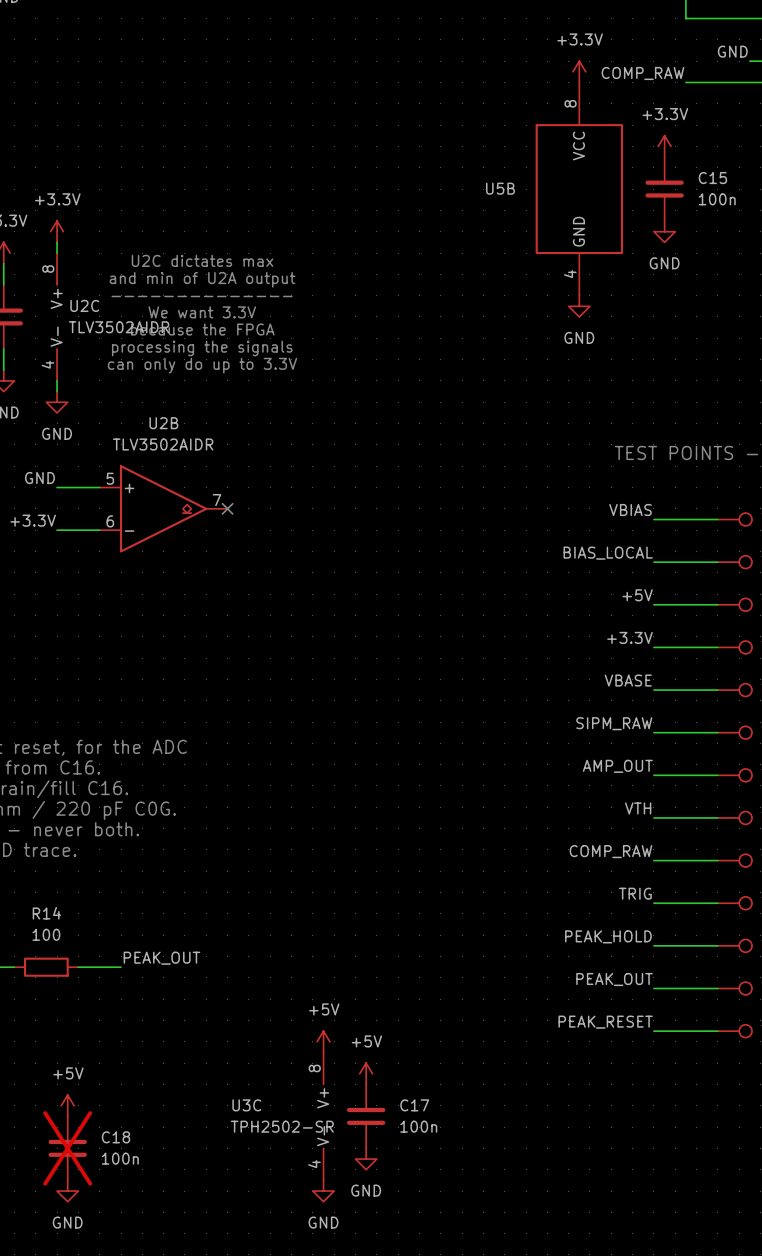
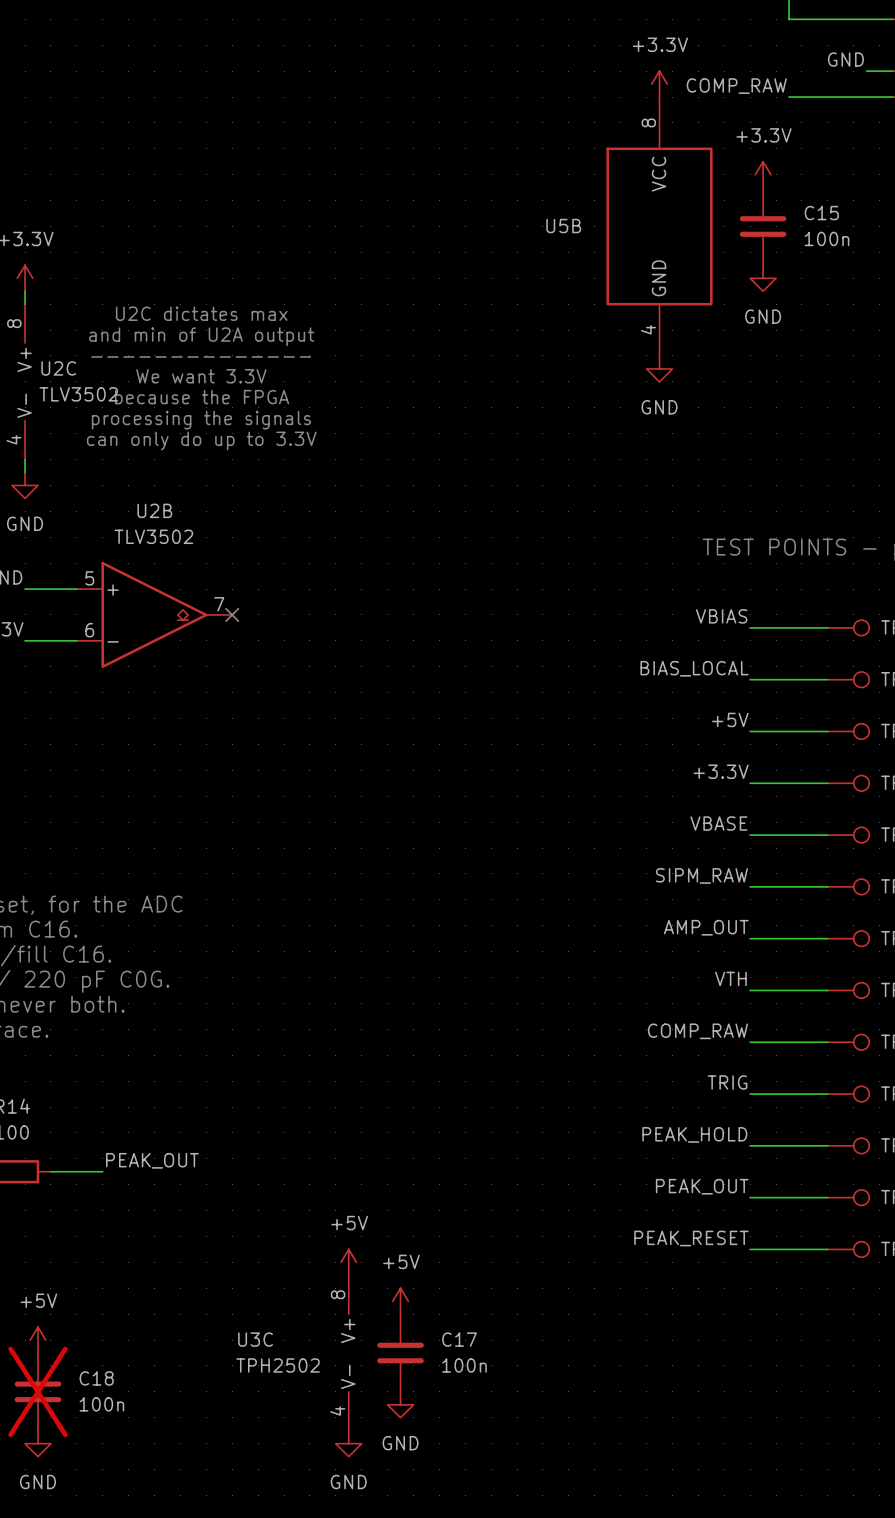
U2C value: TLV3502AIDR (119, 327) -> TLV3502 (78, 394)
U2B value: TLV3502AIDR (163, 444) -> TLV3502 (153, 536)
U3C value: TPH2502-SR (282, 1126) -> TPH2502 (278, 1365)

